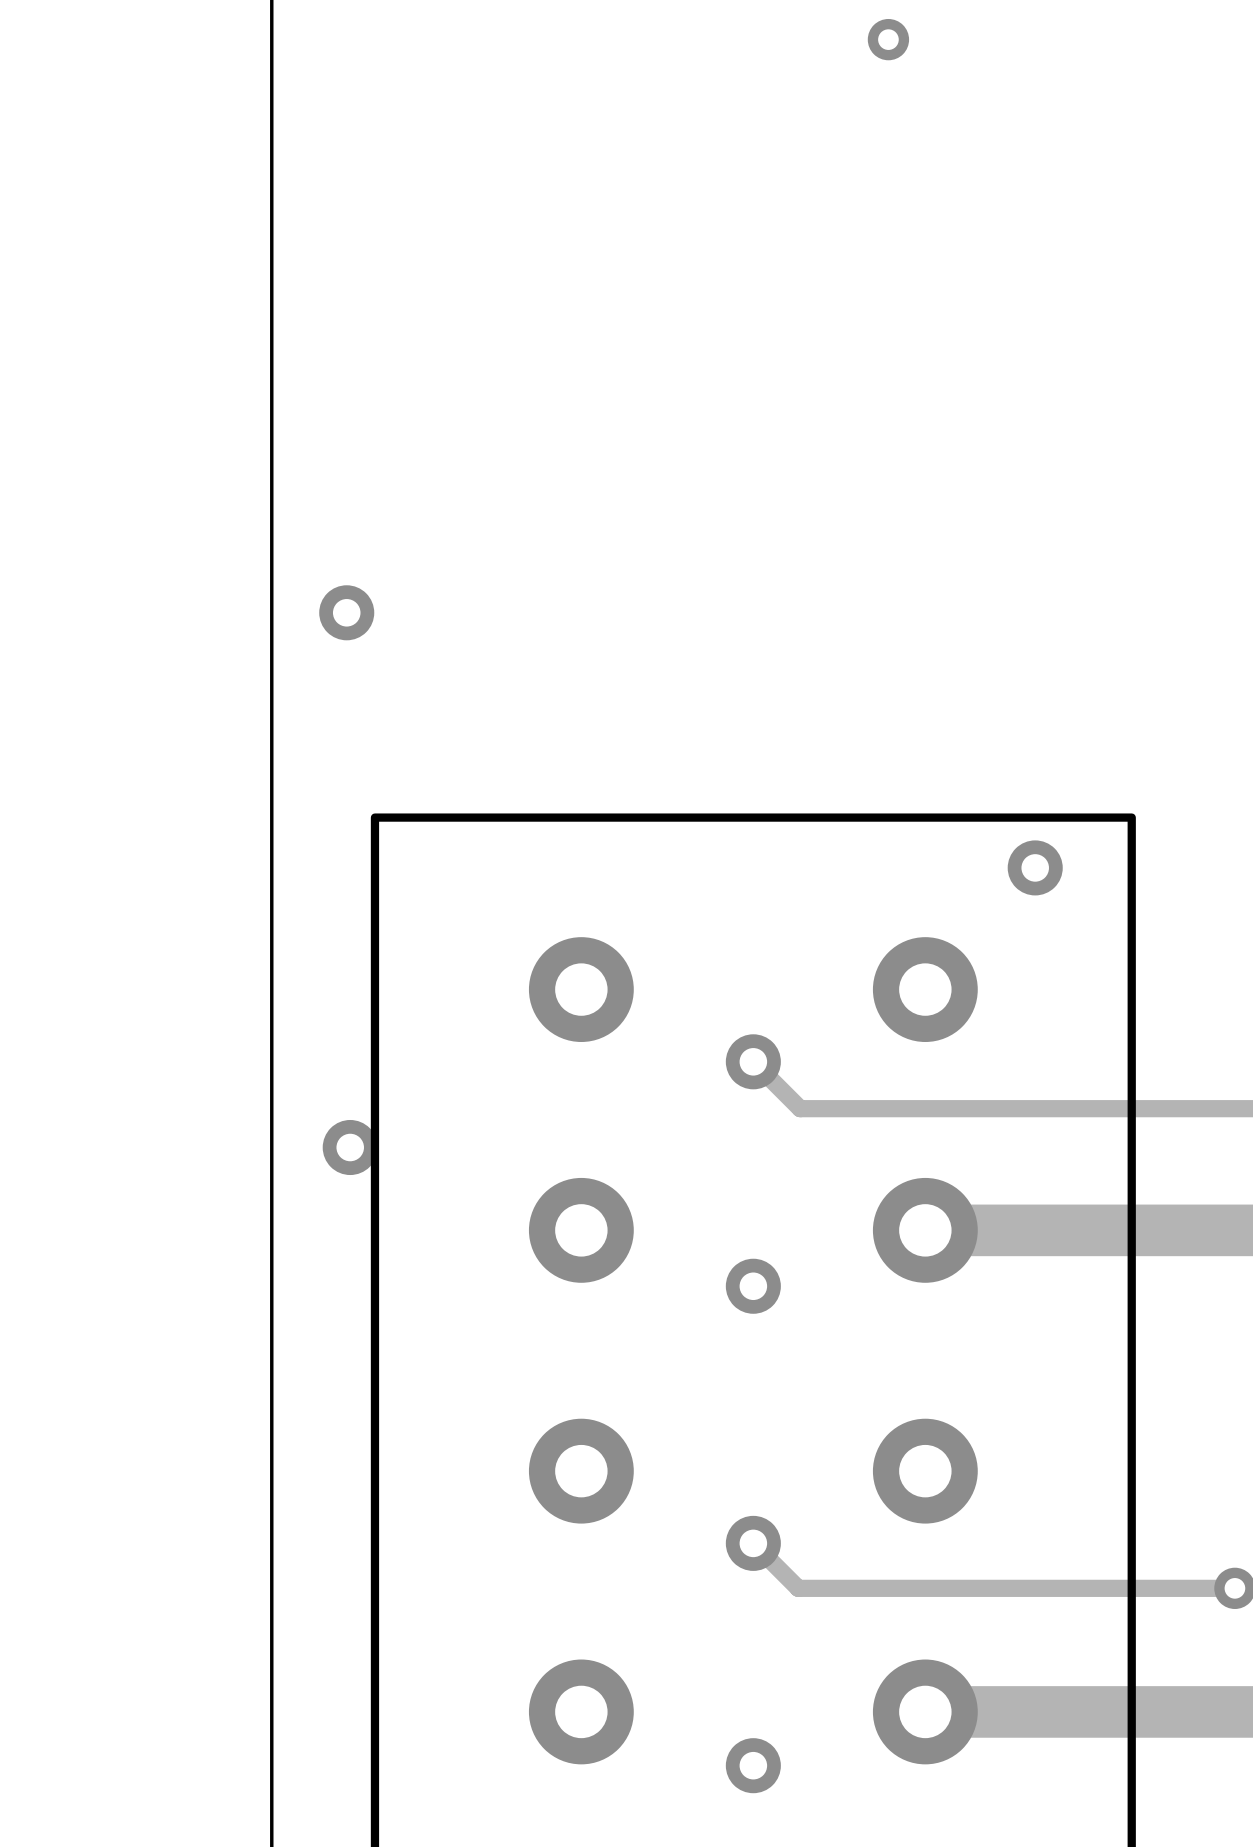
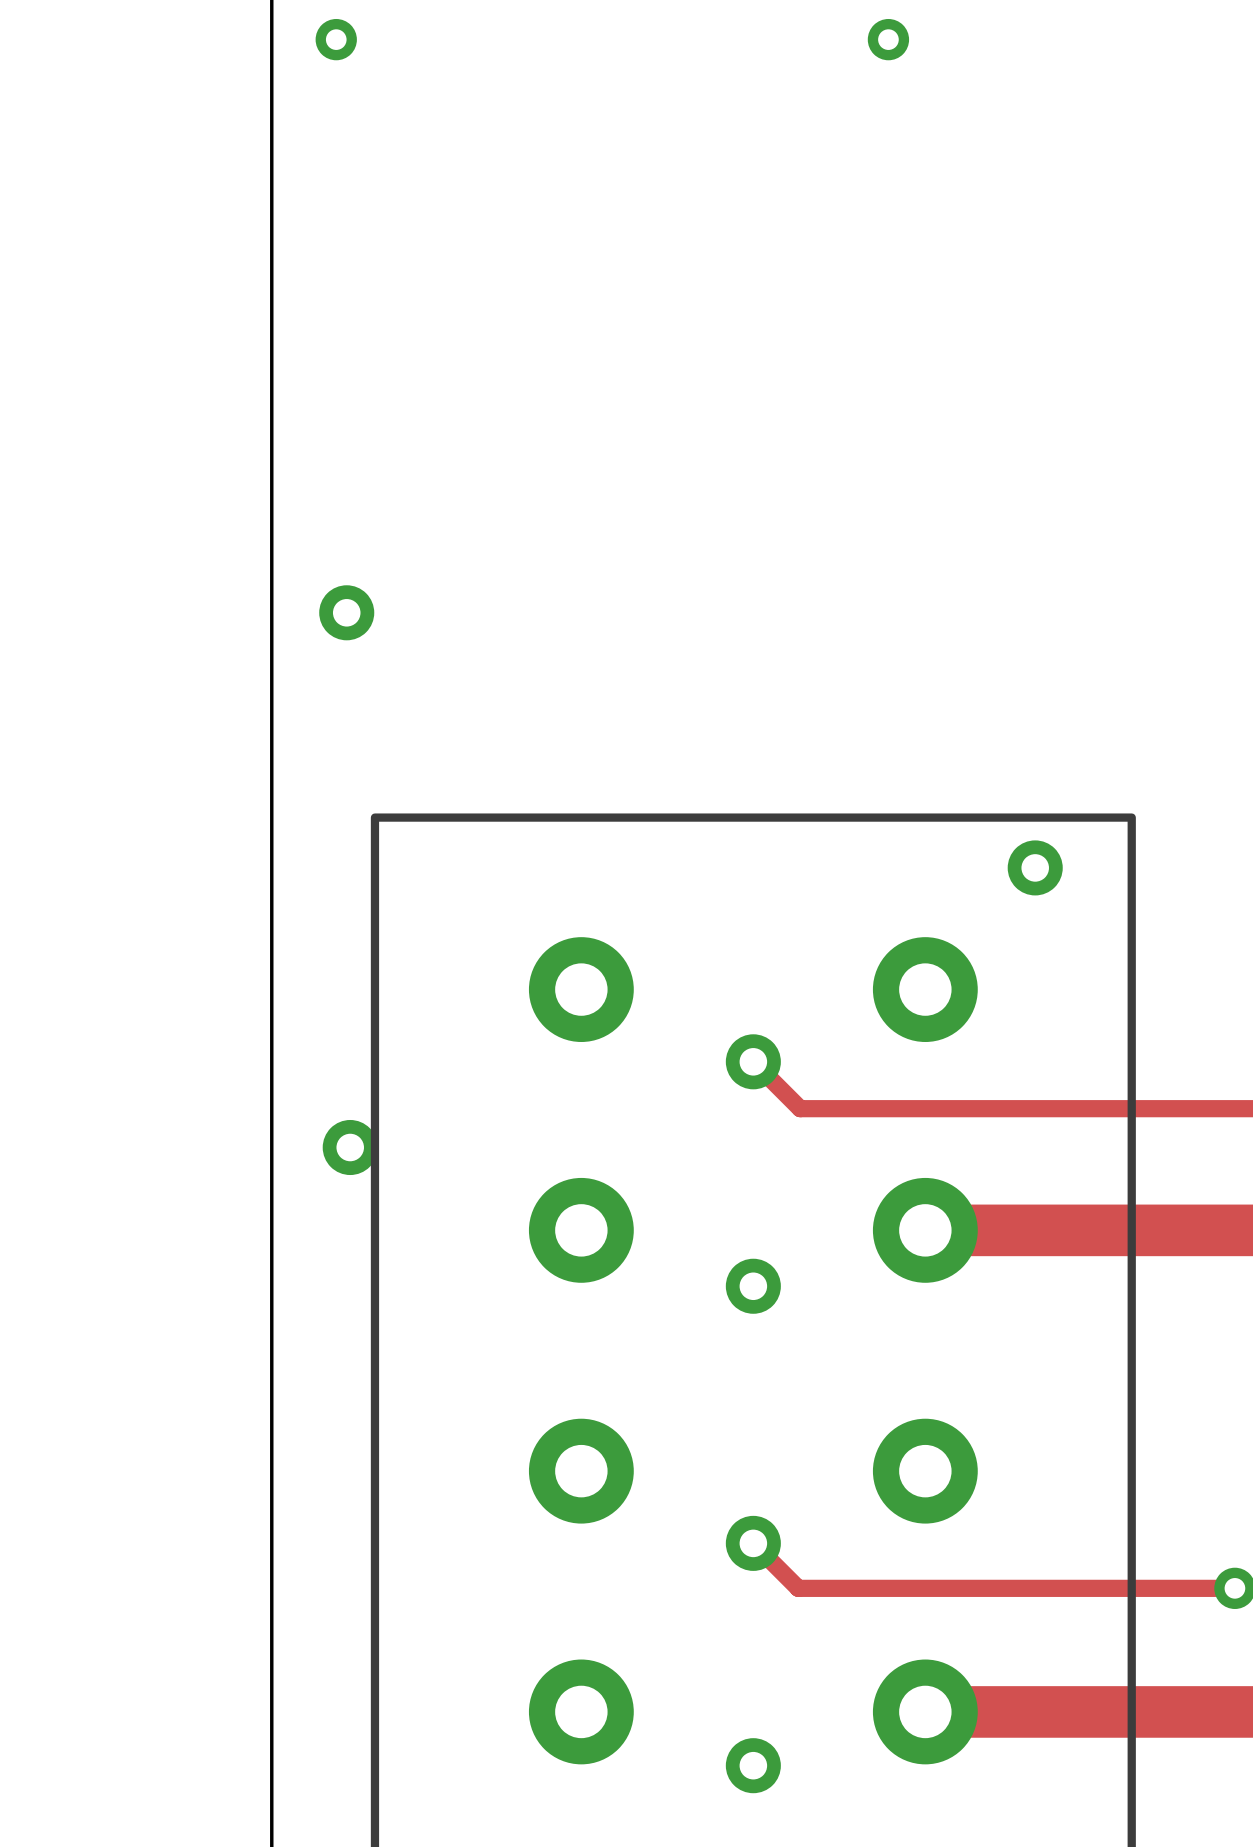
via: none -> (336, 39)

